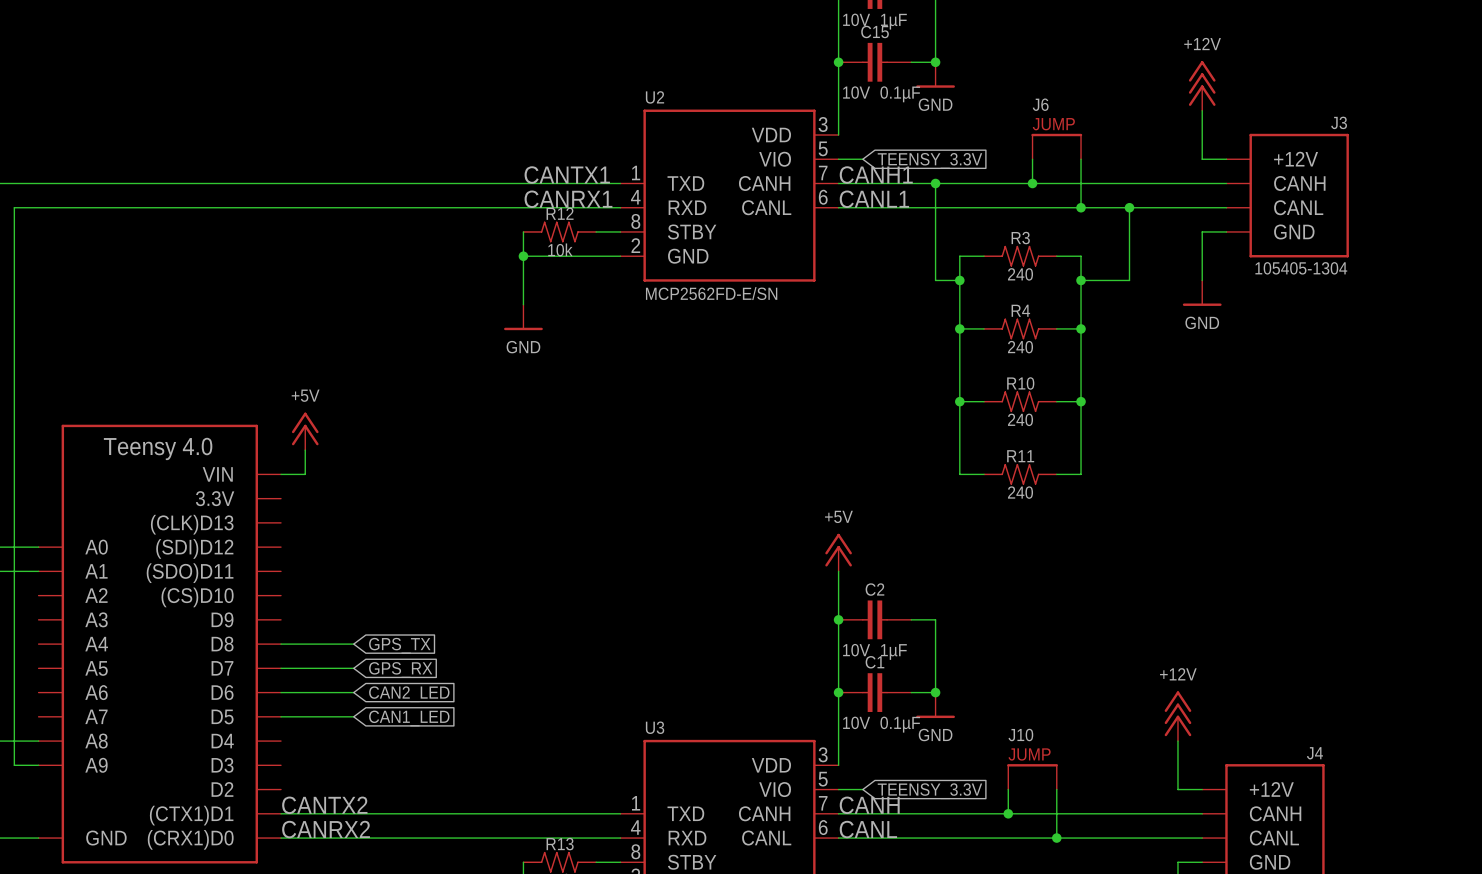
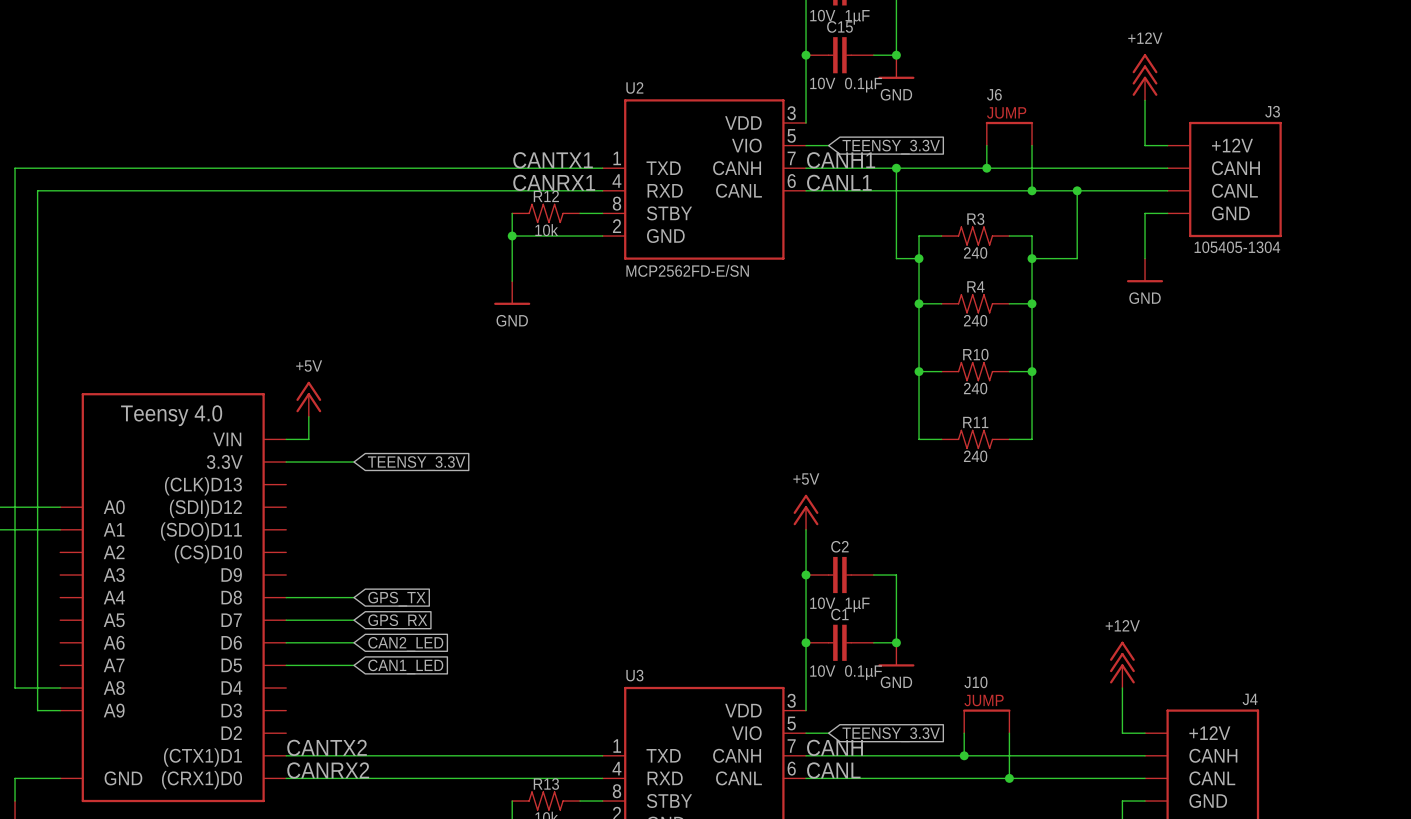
wire: none -> (286, 462) (354, 462)
global label: none -> TEENSY_3.3V (416, 463)

